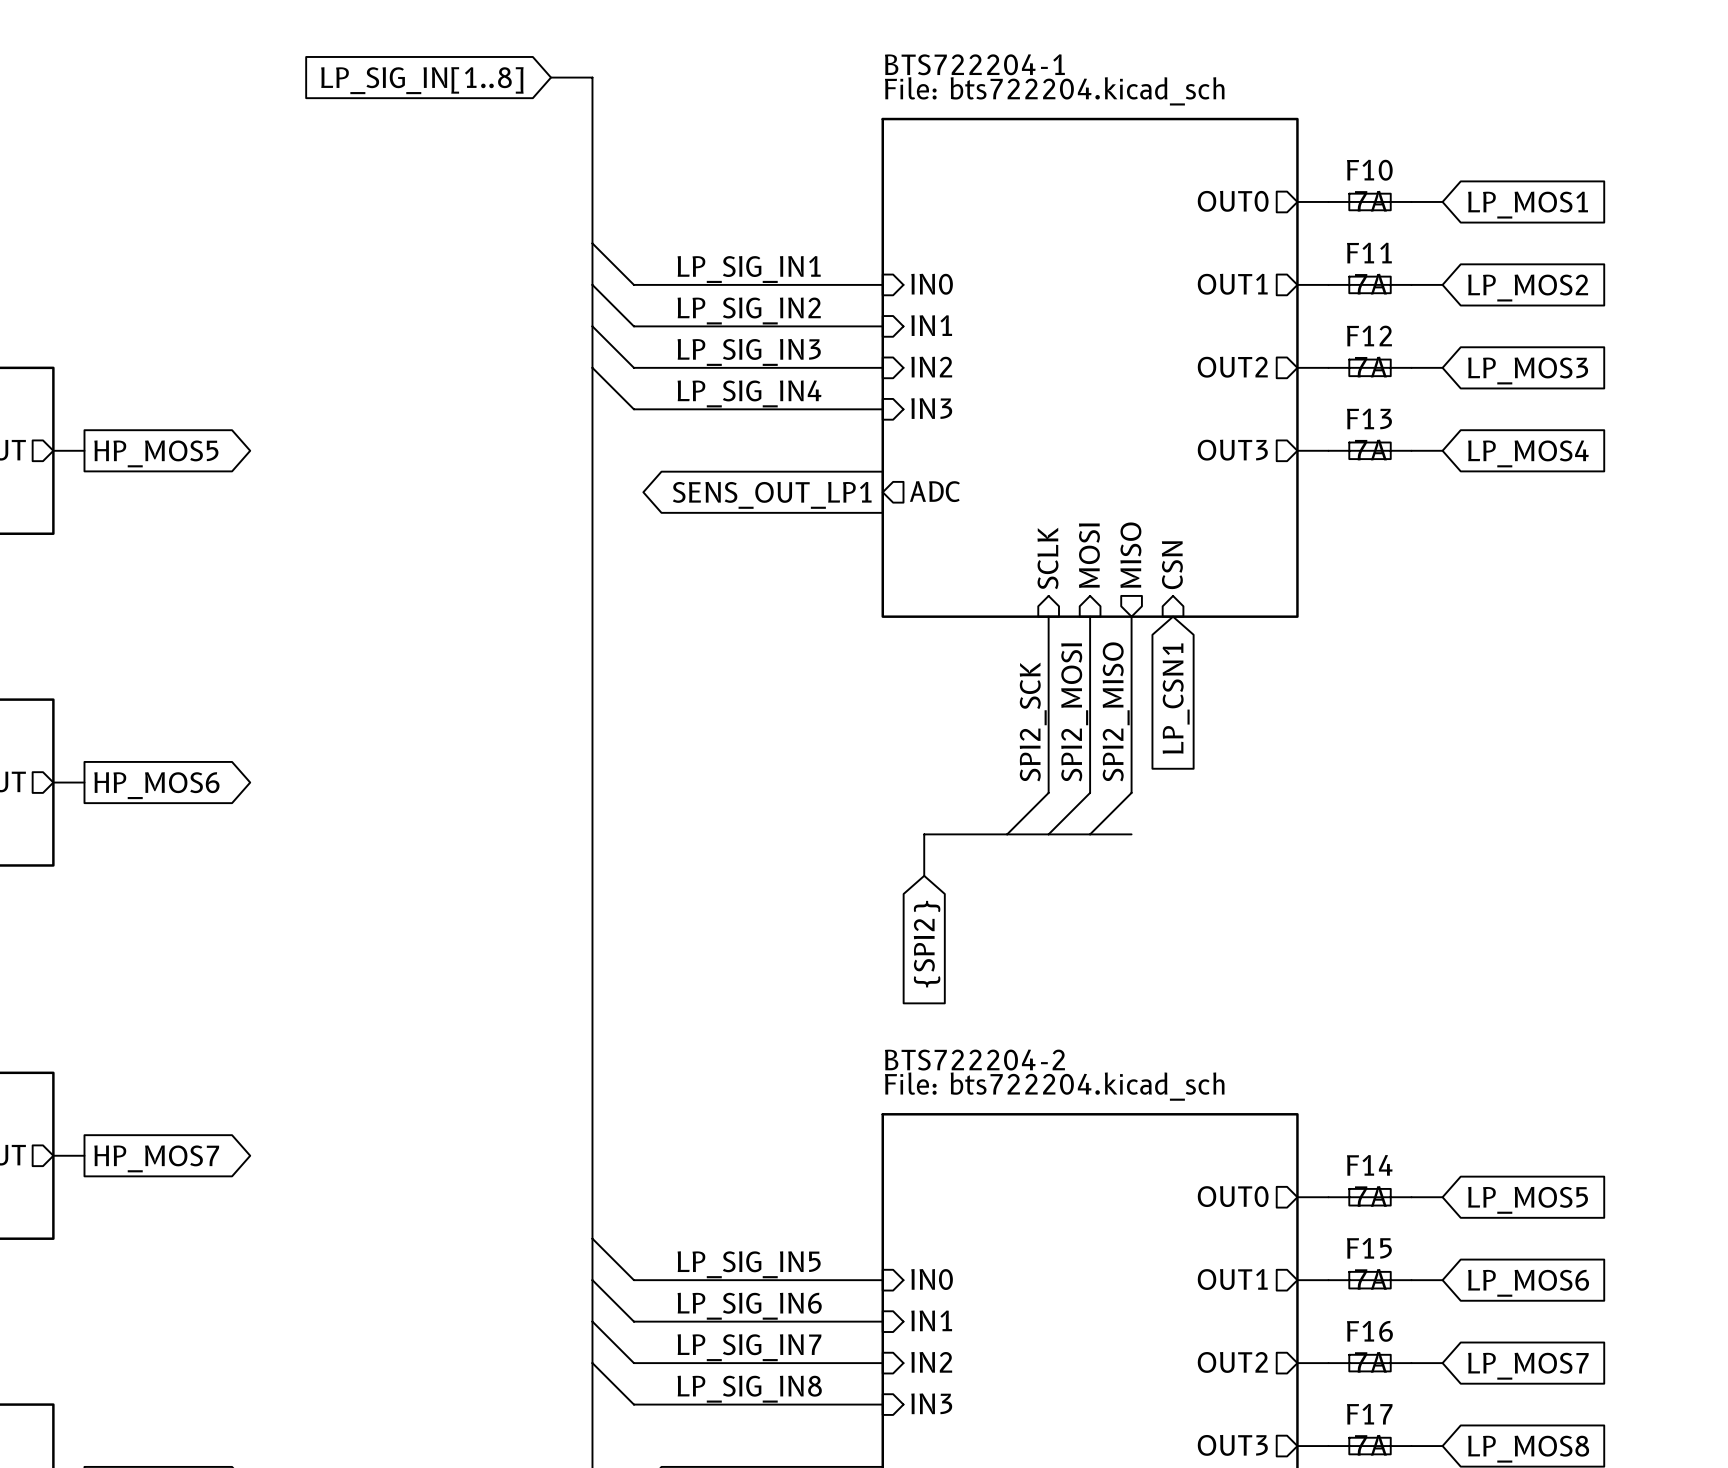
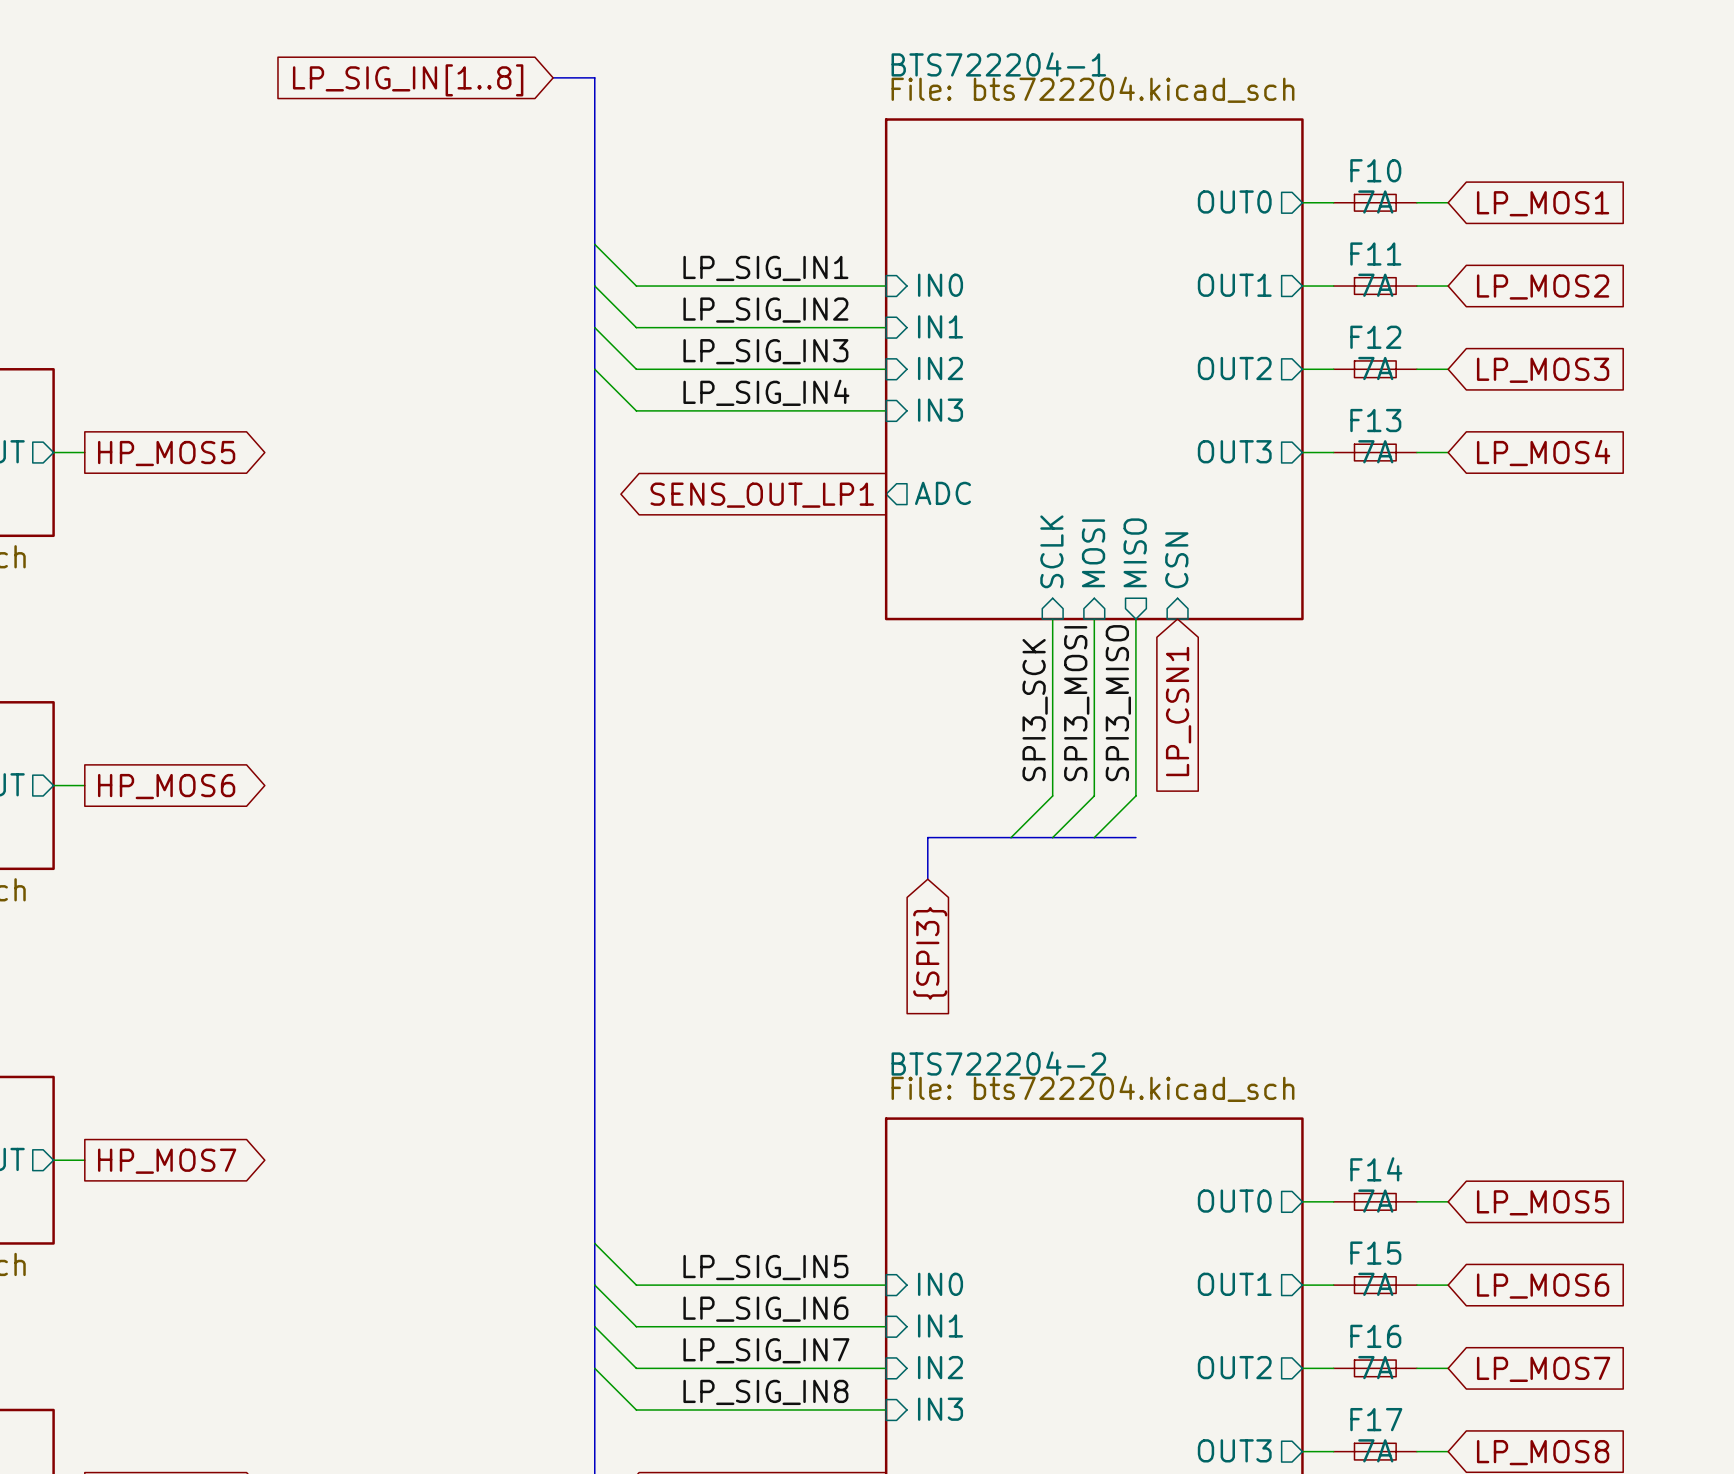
label: SPI2_MISO (1116, 711) -> SPI3_MISO (1118, 703)
label: SPI2_MOSI (1074, 712) -> SPI3_MOSI (1076, 703)
label: SPI2_SCK (1033, 722) -> SPI3_SCK (1035, 710)
global label: {SPI2} (927, 944) -> {SPI3} (930, 953)

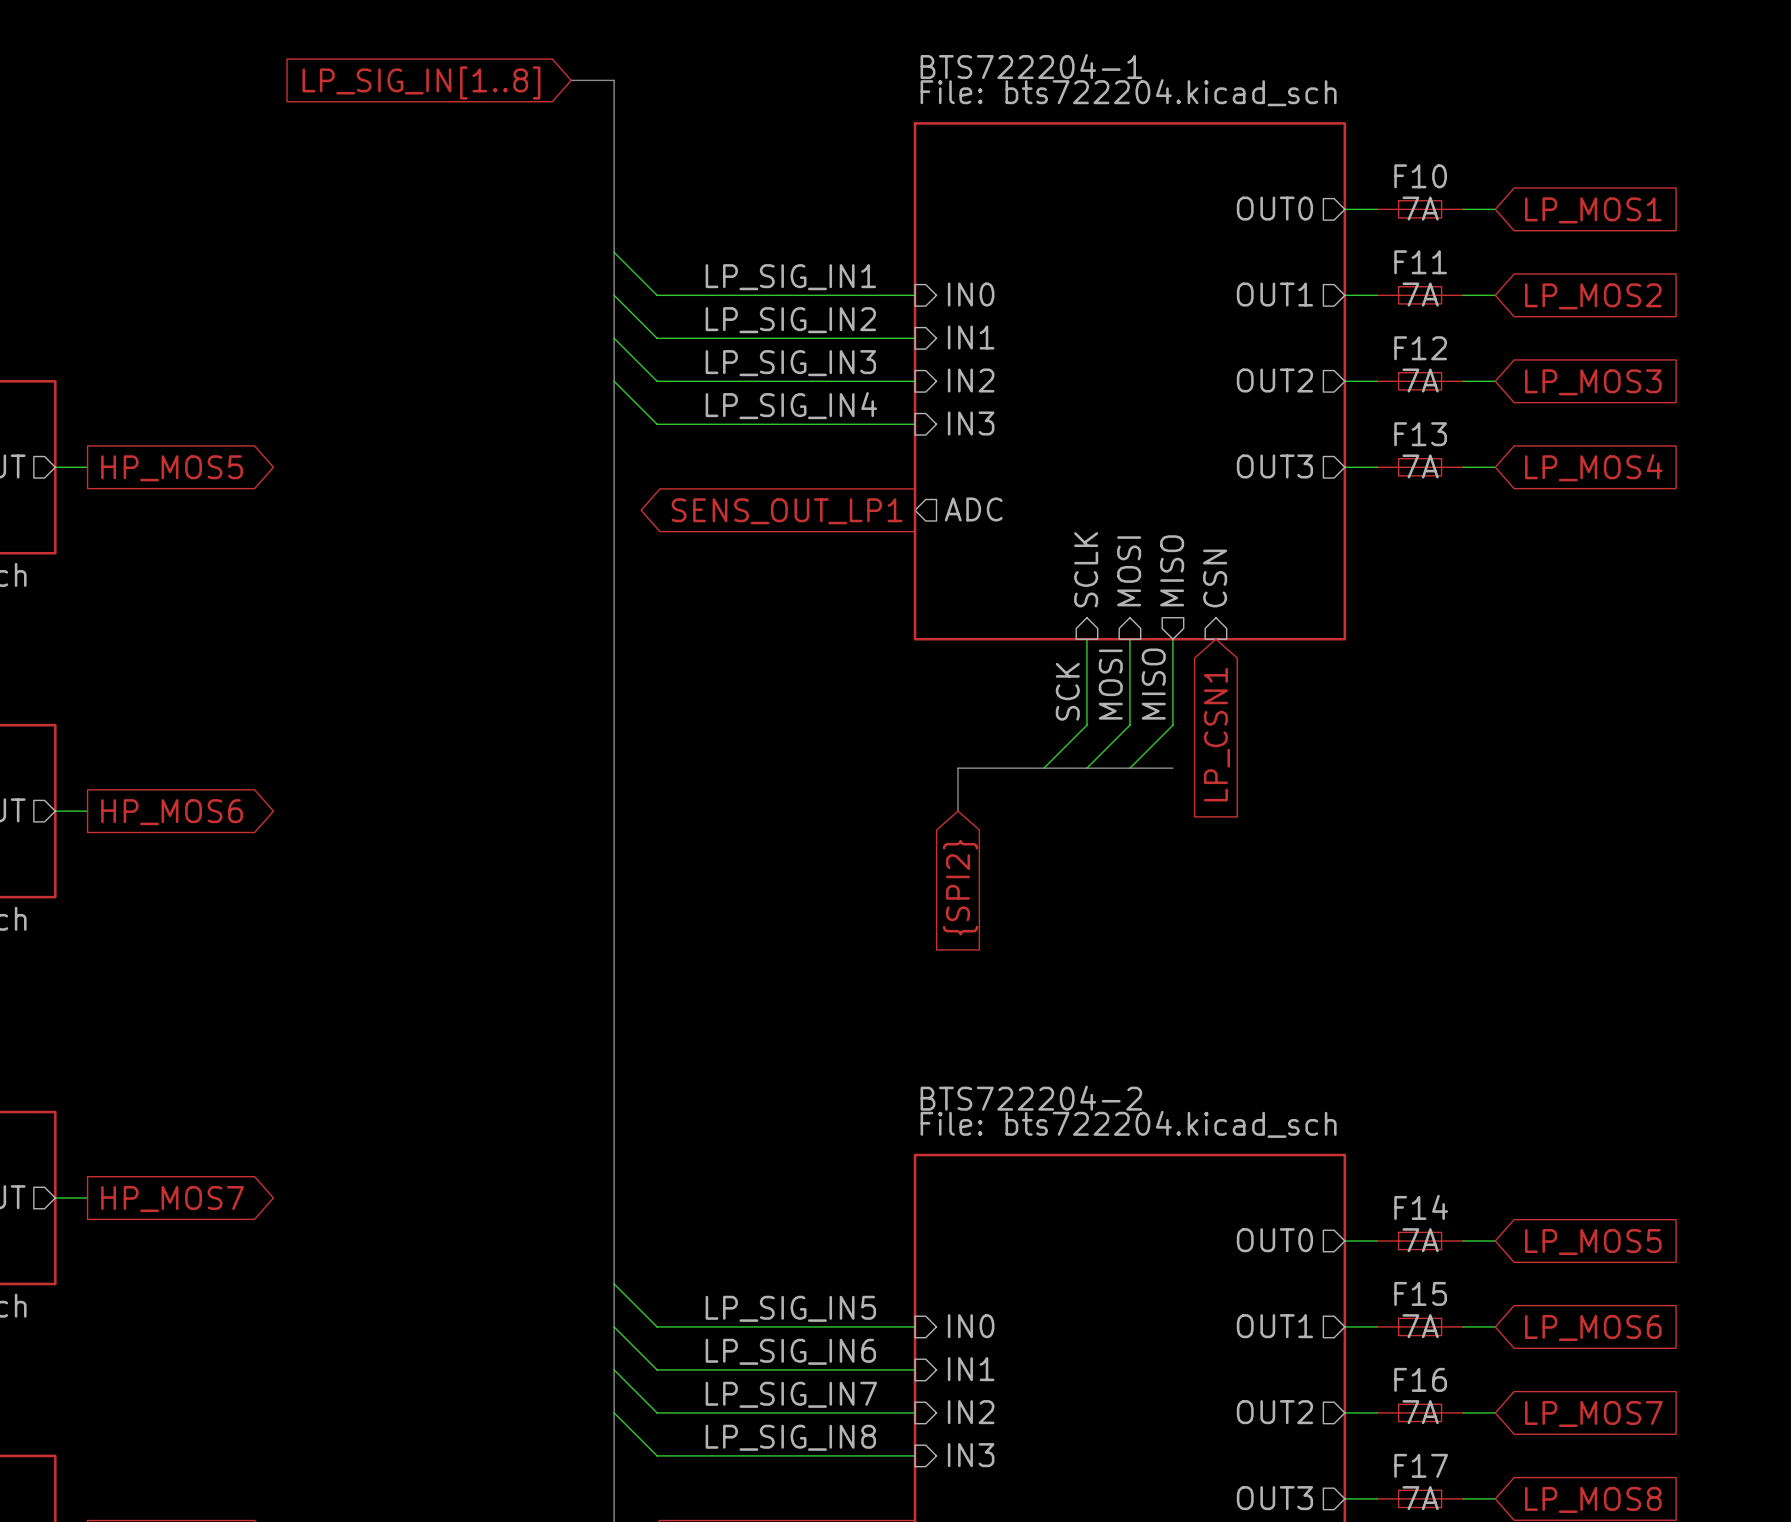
label: none -> SCK (1067, 691)
wire: (1052, 702) (1052, 795) (1011, 837) -> (1086, 725) (1043, 768)
wire: (1094, 702) (1094, 795) (1052, 837) -> (1129, 725) (1086, 768)
wire: (1135, 702) (1135, 795) (1094, 837) -> (1172, 725) (1129, 768)
label: SPI3_MOSI (1076, 703) -> MOSI (1110, 684)
label: SPI3_MISO (1118, 703) -> MISO (1153, 684)
label: SPI3_SCK (1035, 710) -> none
bus: (1135, 837) (927, 837) (927, 879) -> (1172, 768) (958, 768) (958, 811)
global label: {SPI3} (930, 953) -> {SPI2} (960, 887)

